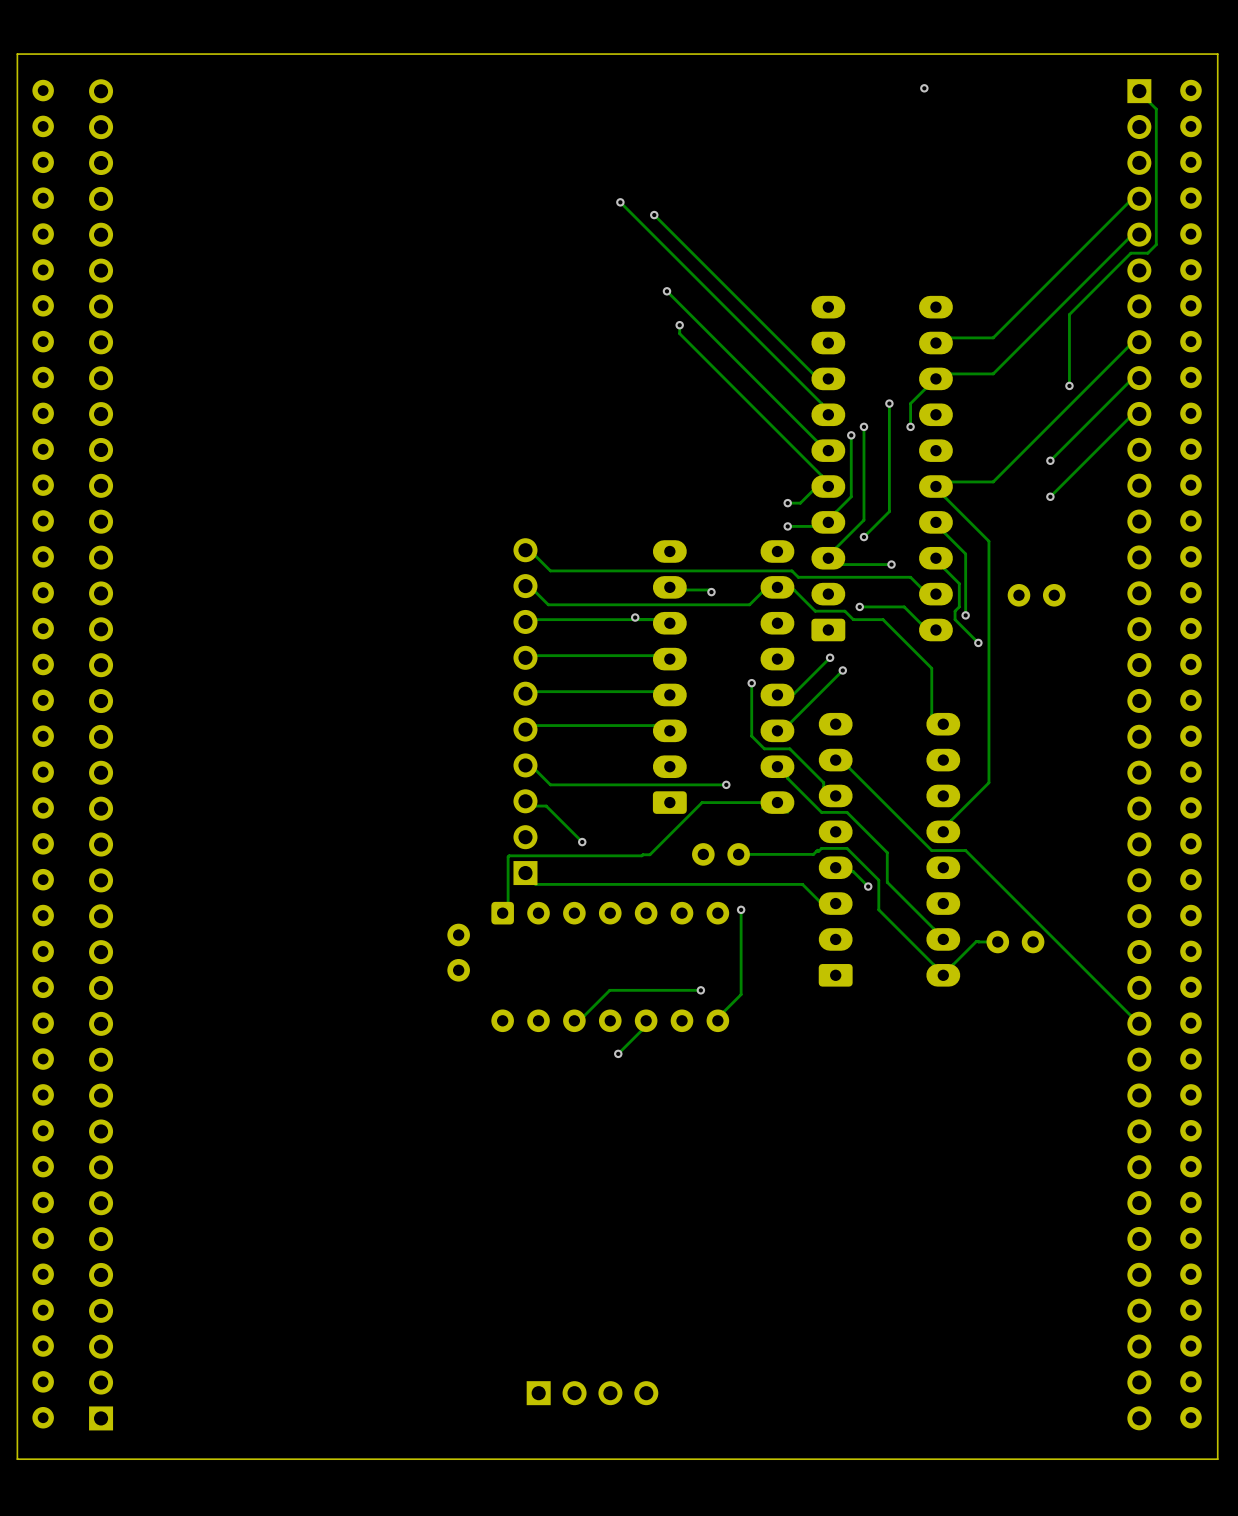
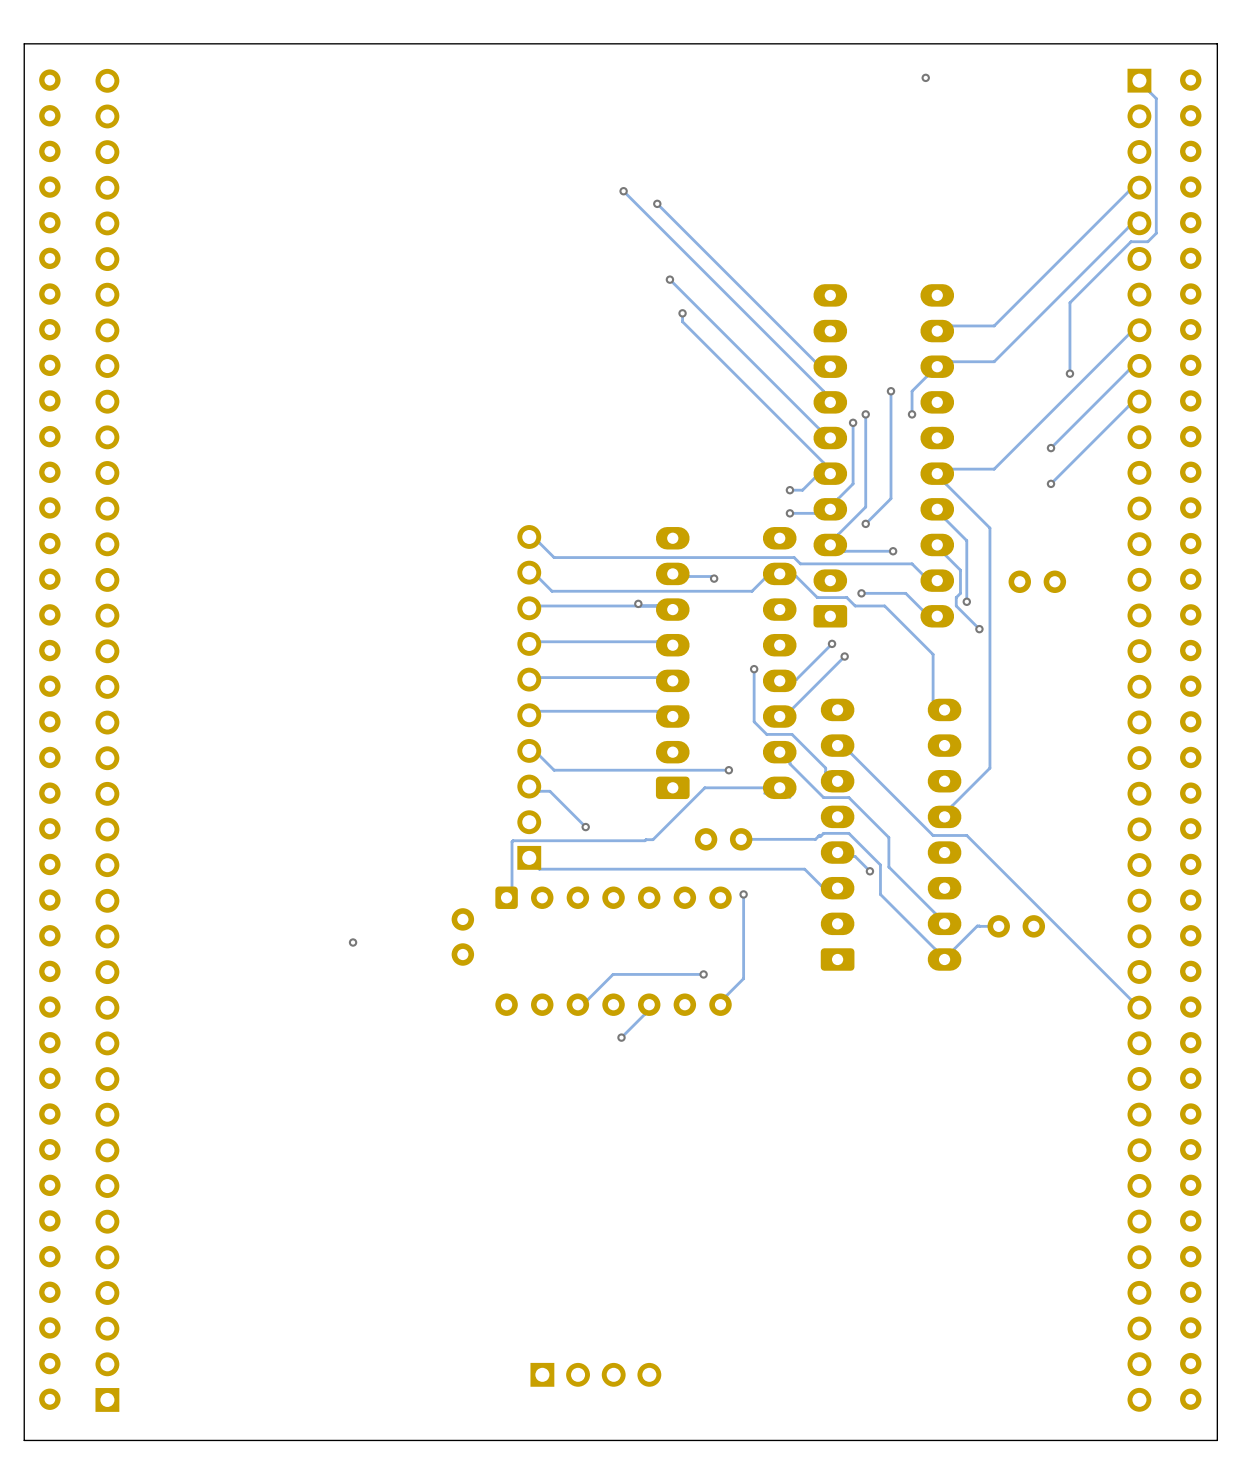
via: none -> (353, 942)

